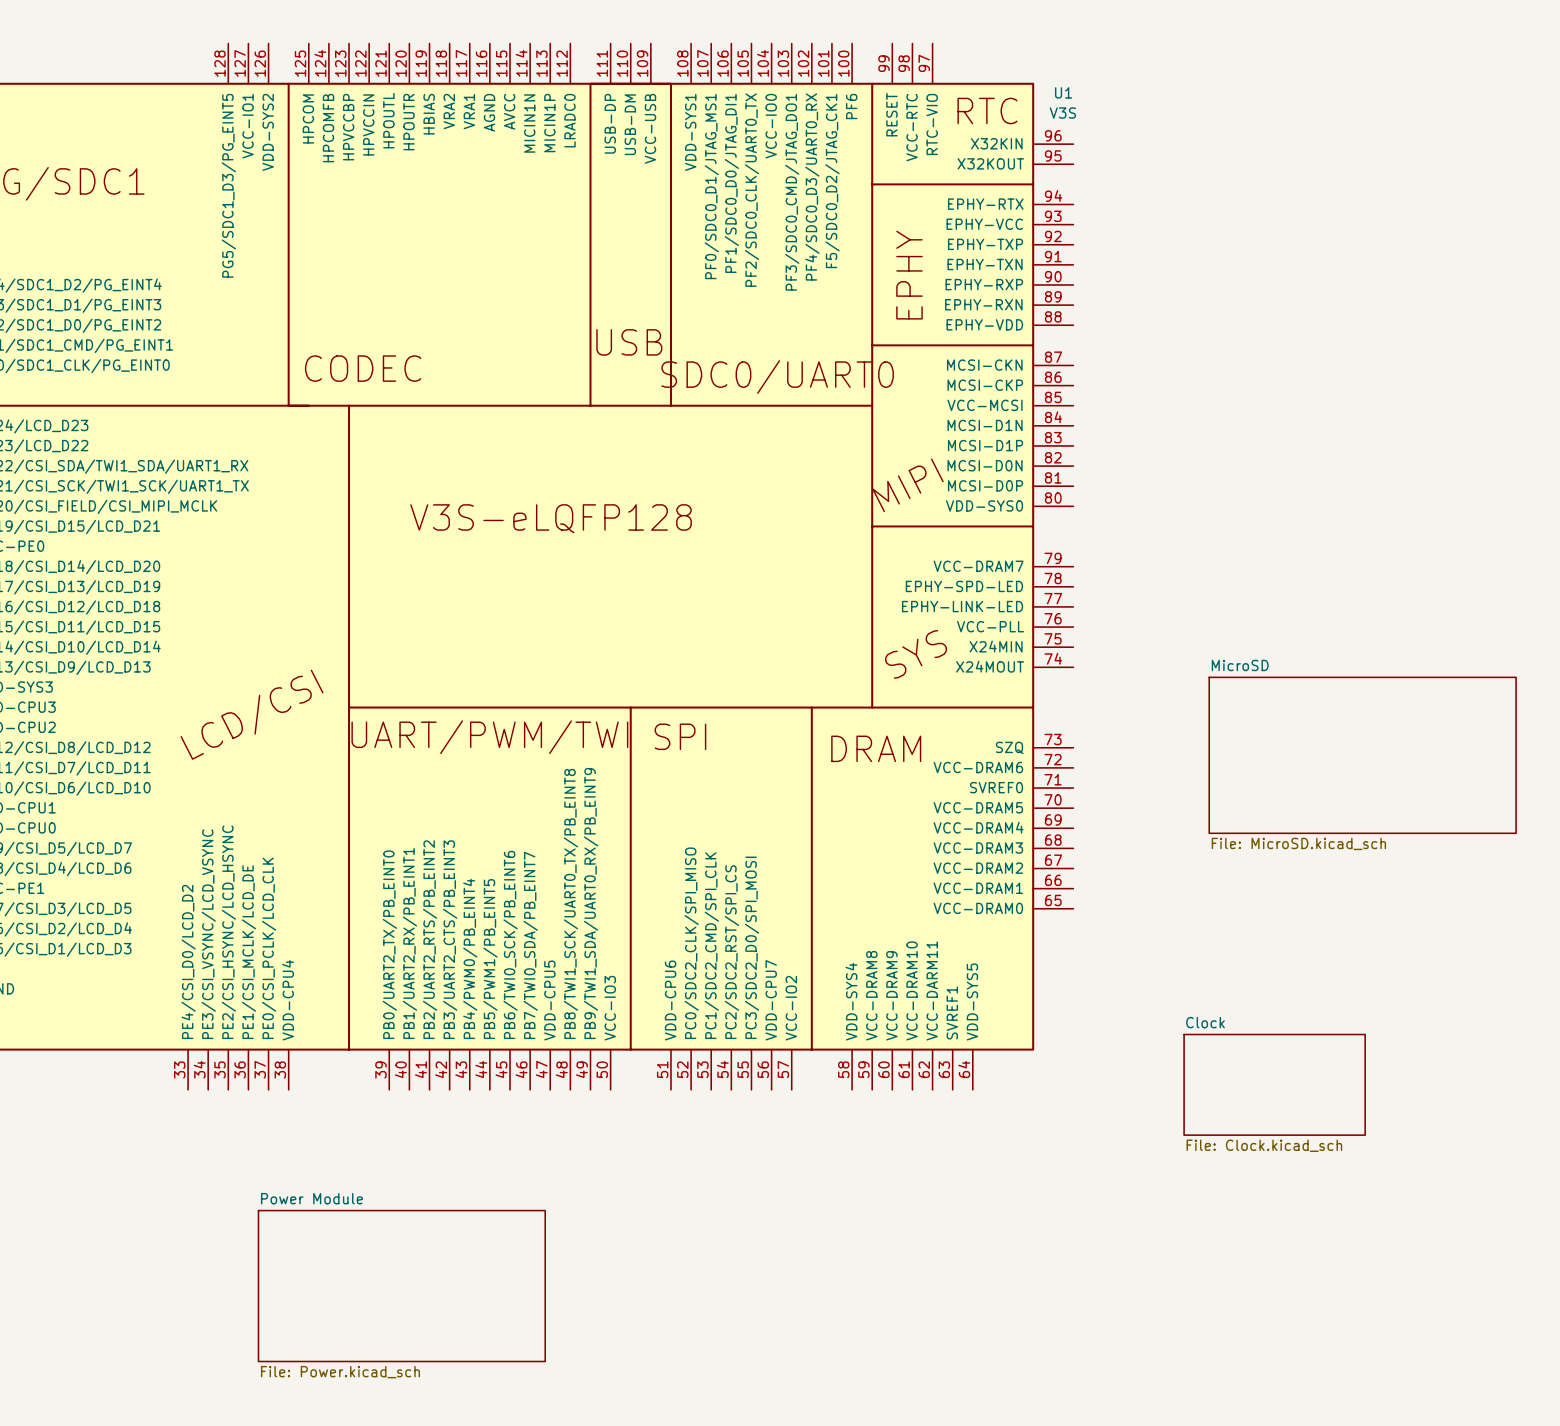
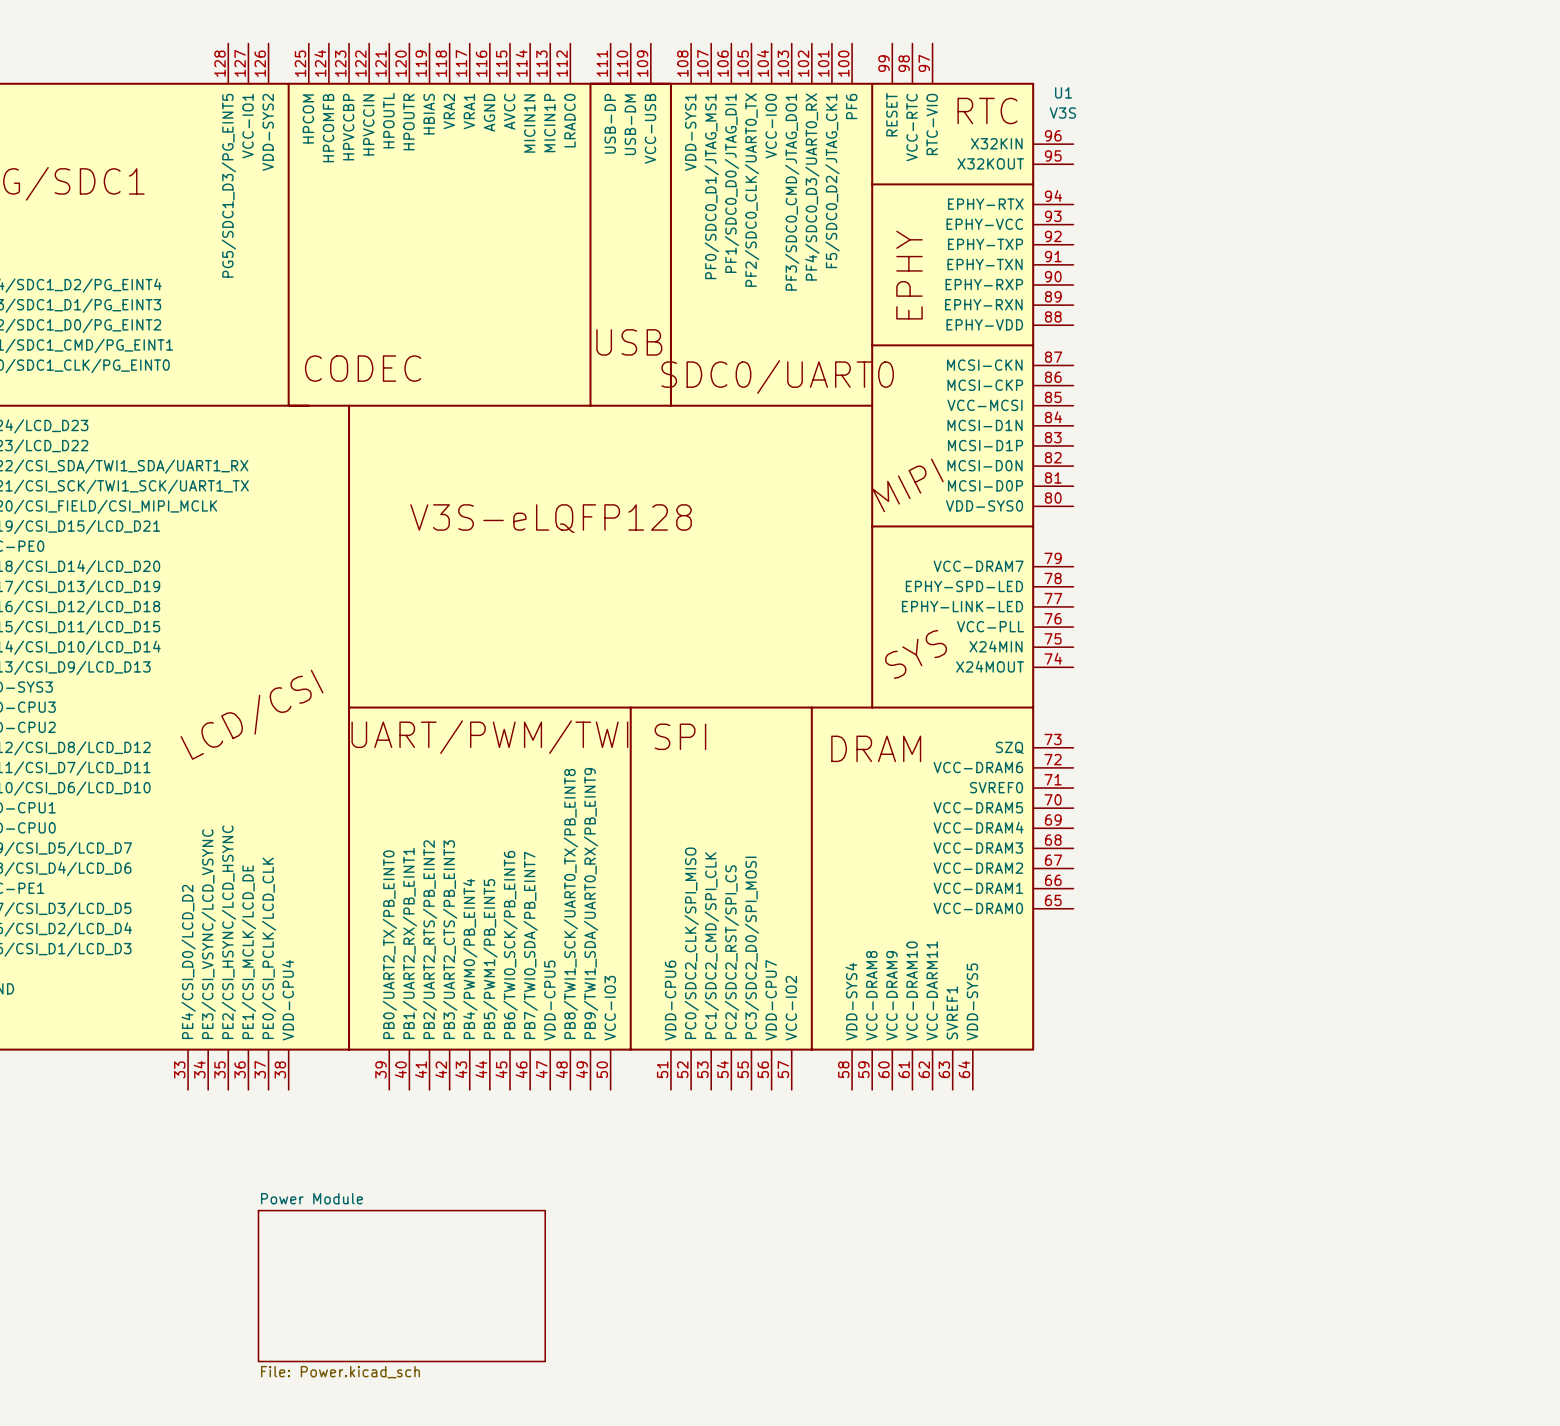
sheet MicroSD: File: MicroSD.kicad_sch (1362, 755) -> none
sheet Clock: File: Clock.kicad_sch (1274, 1084) -> none

